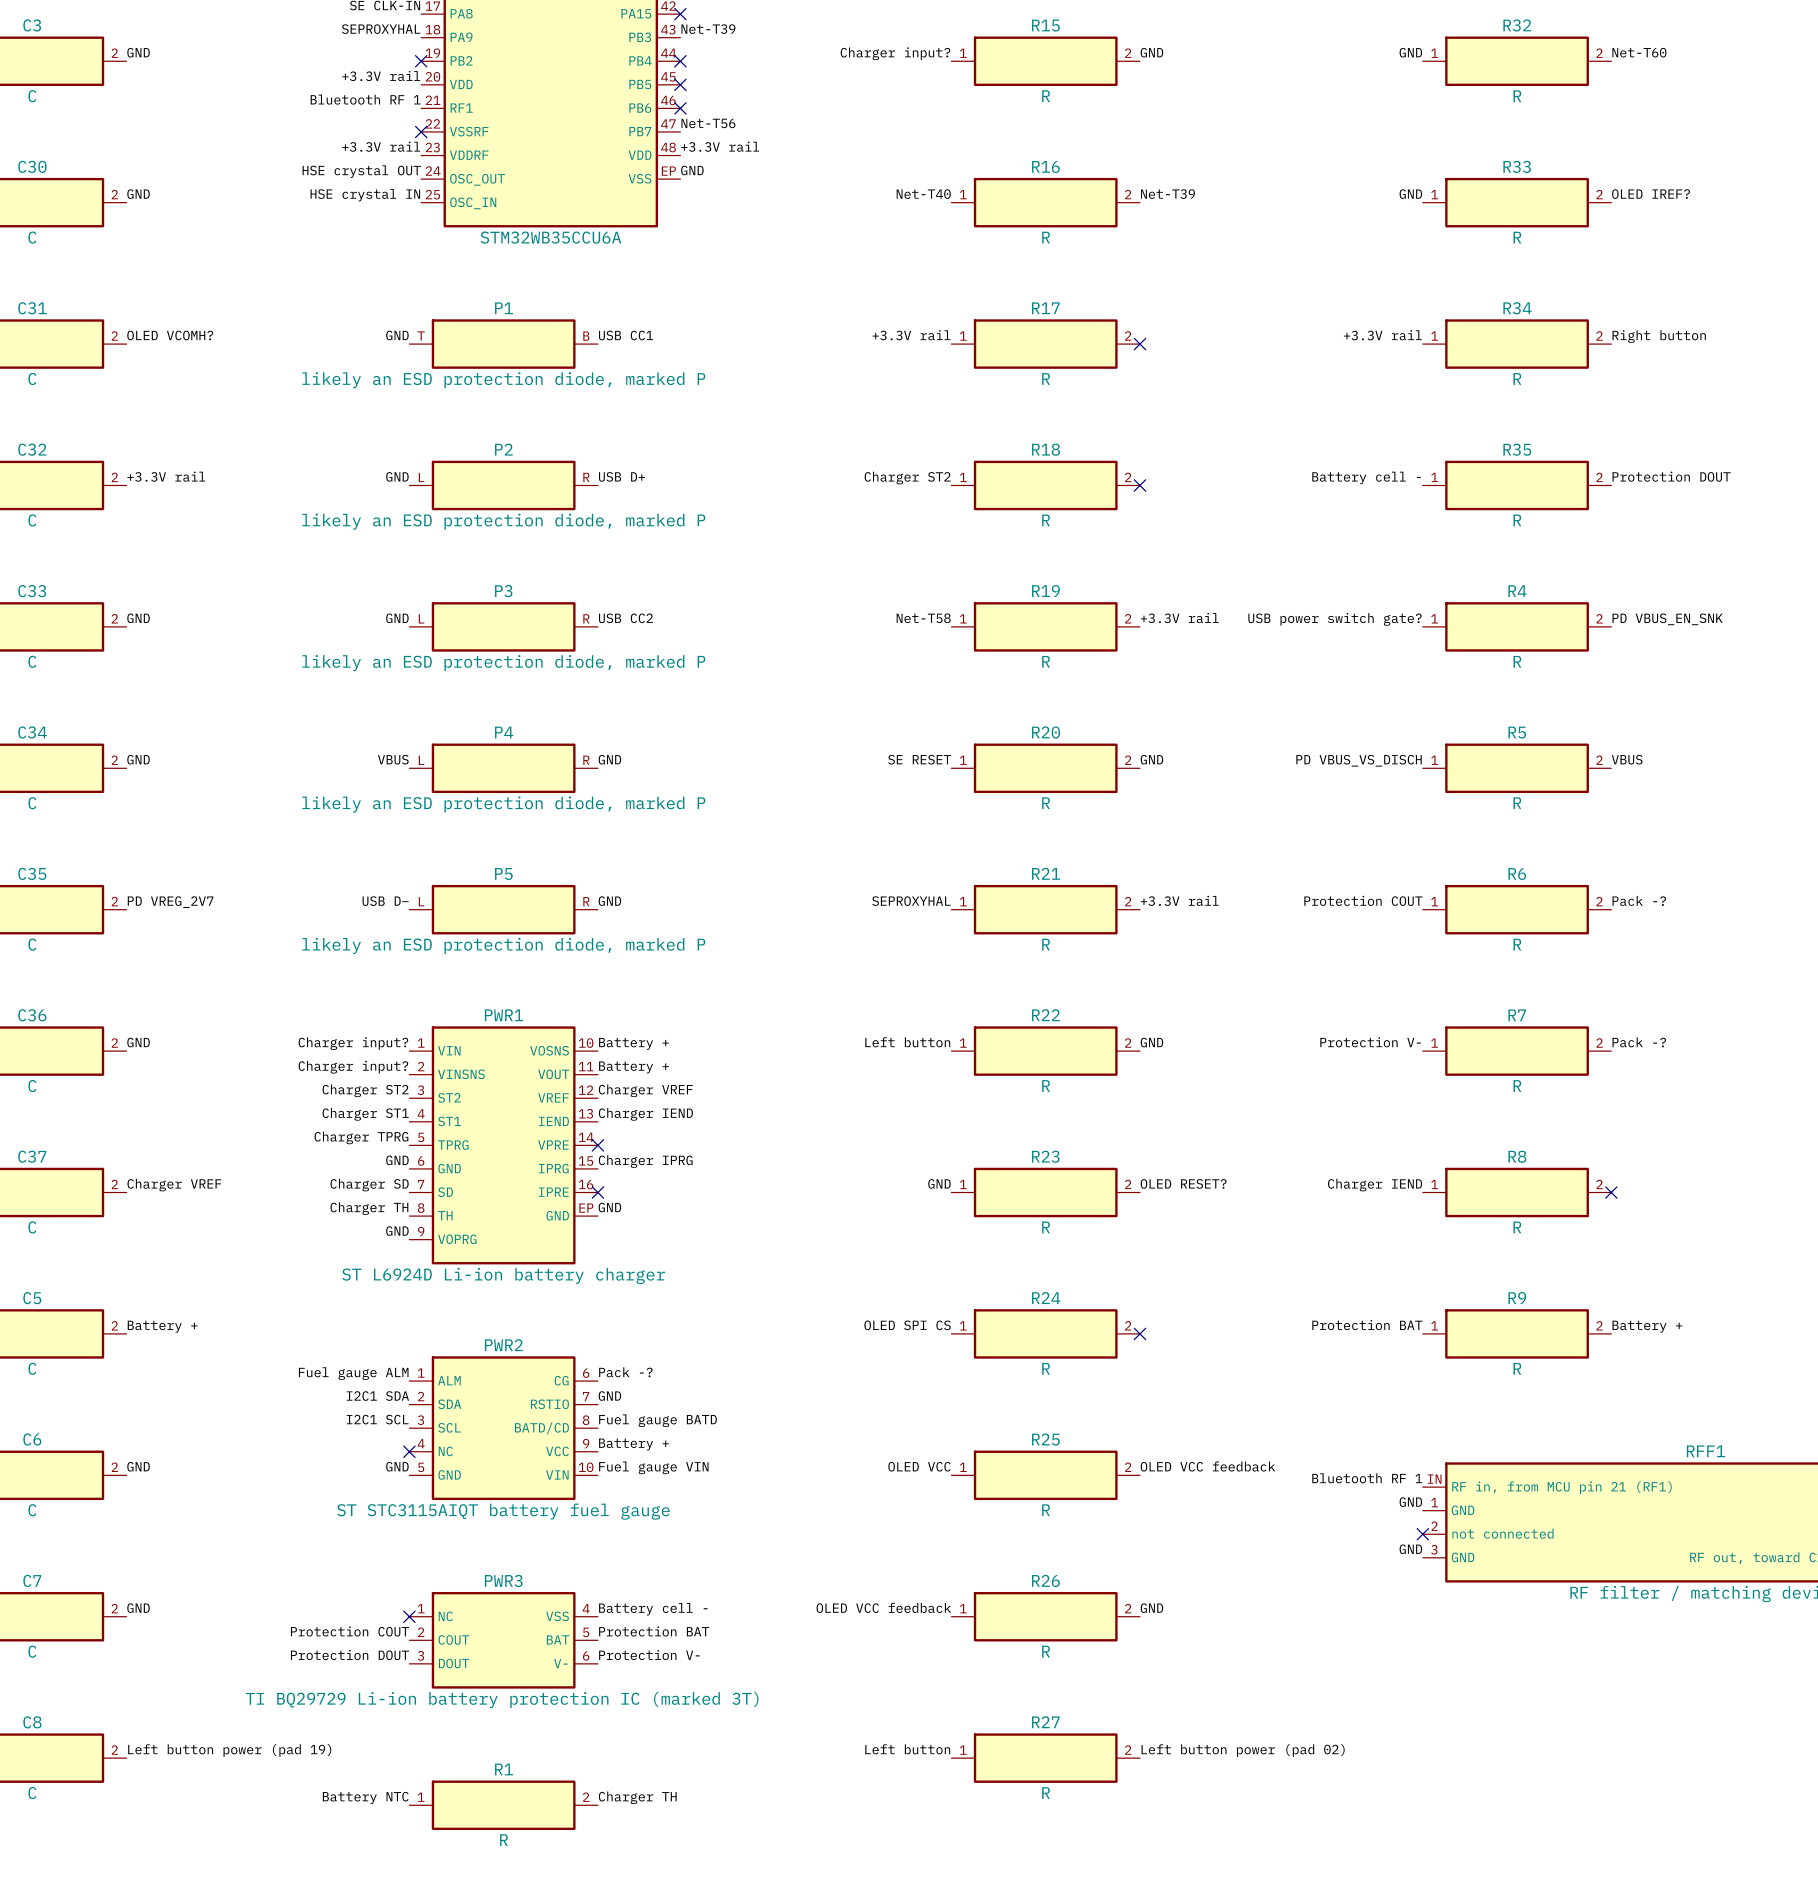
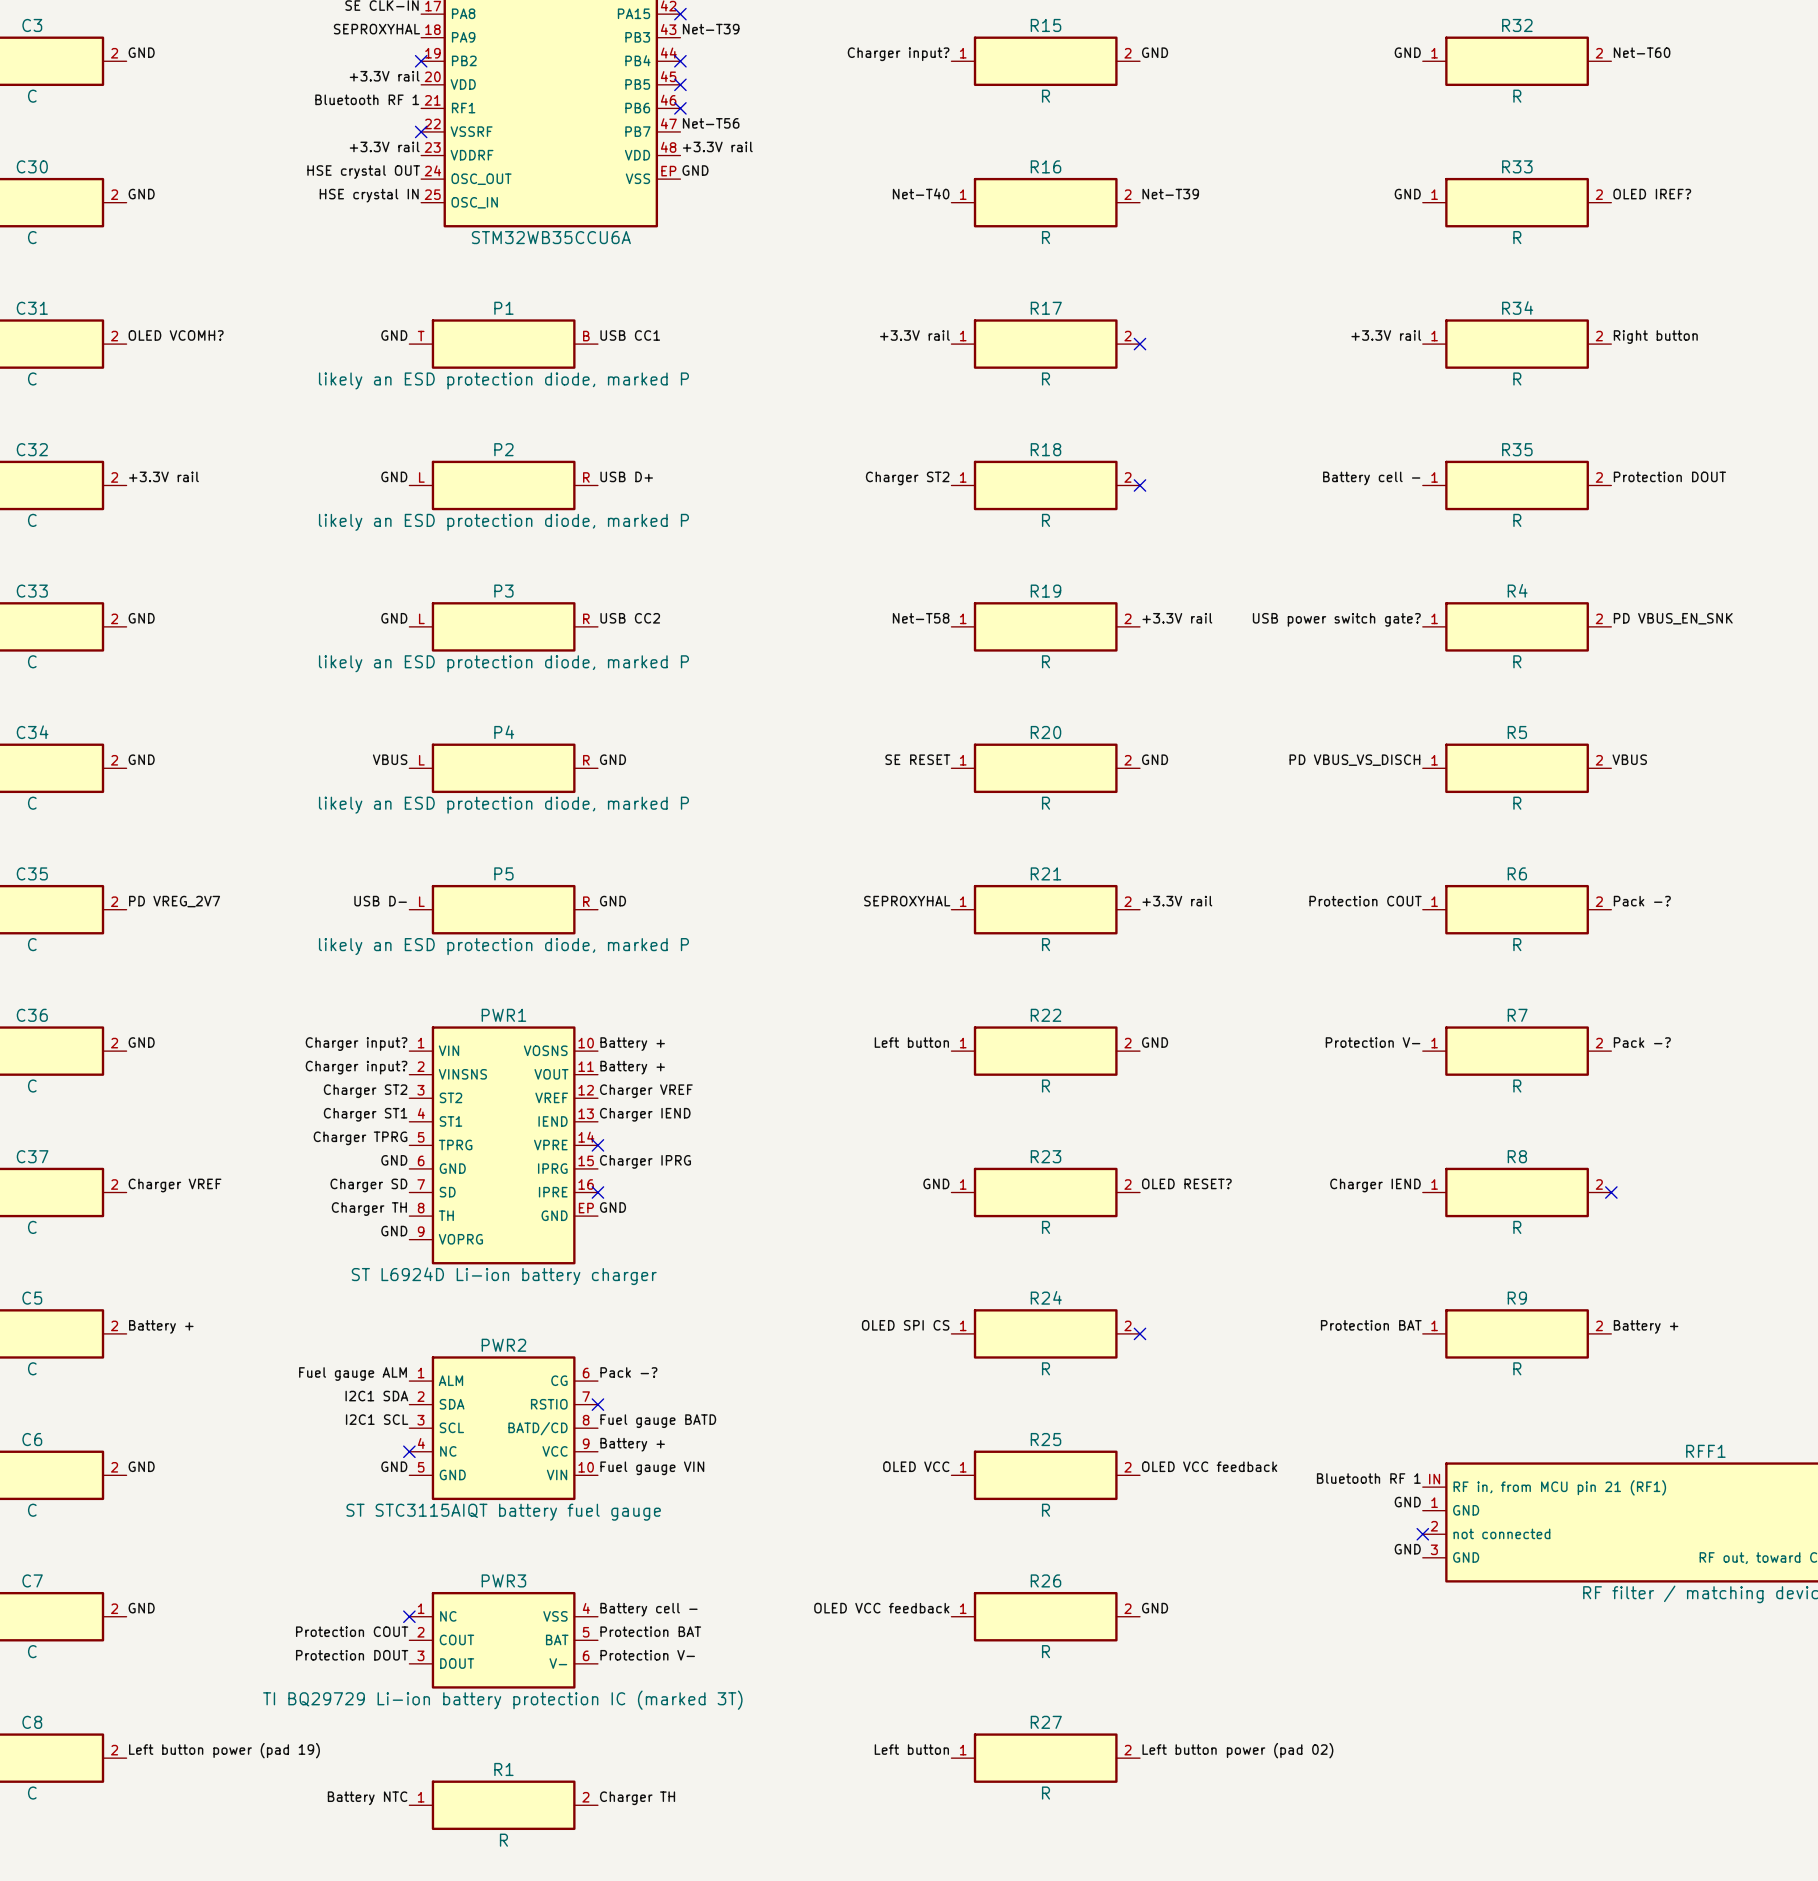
label: GND (609, 1396) -> none
no-connect mark: none -> (597, 1404)

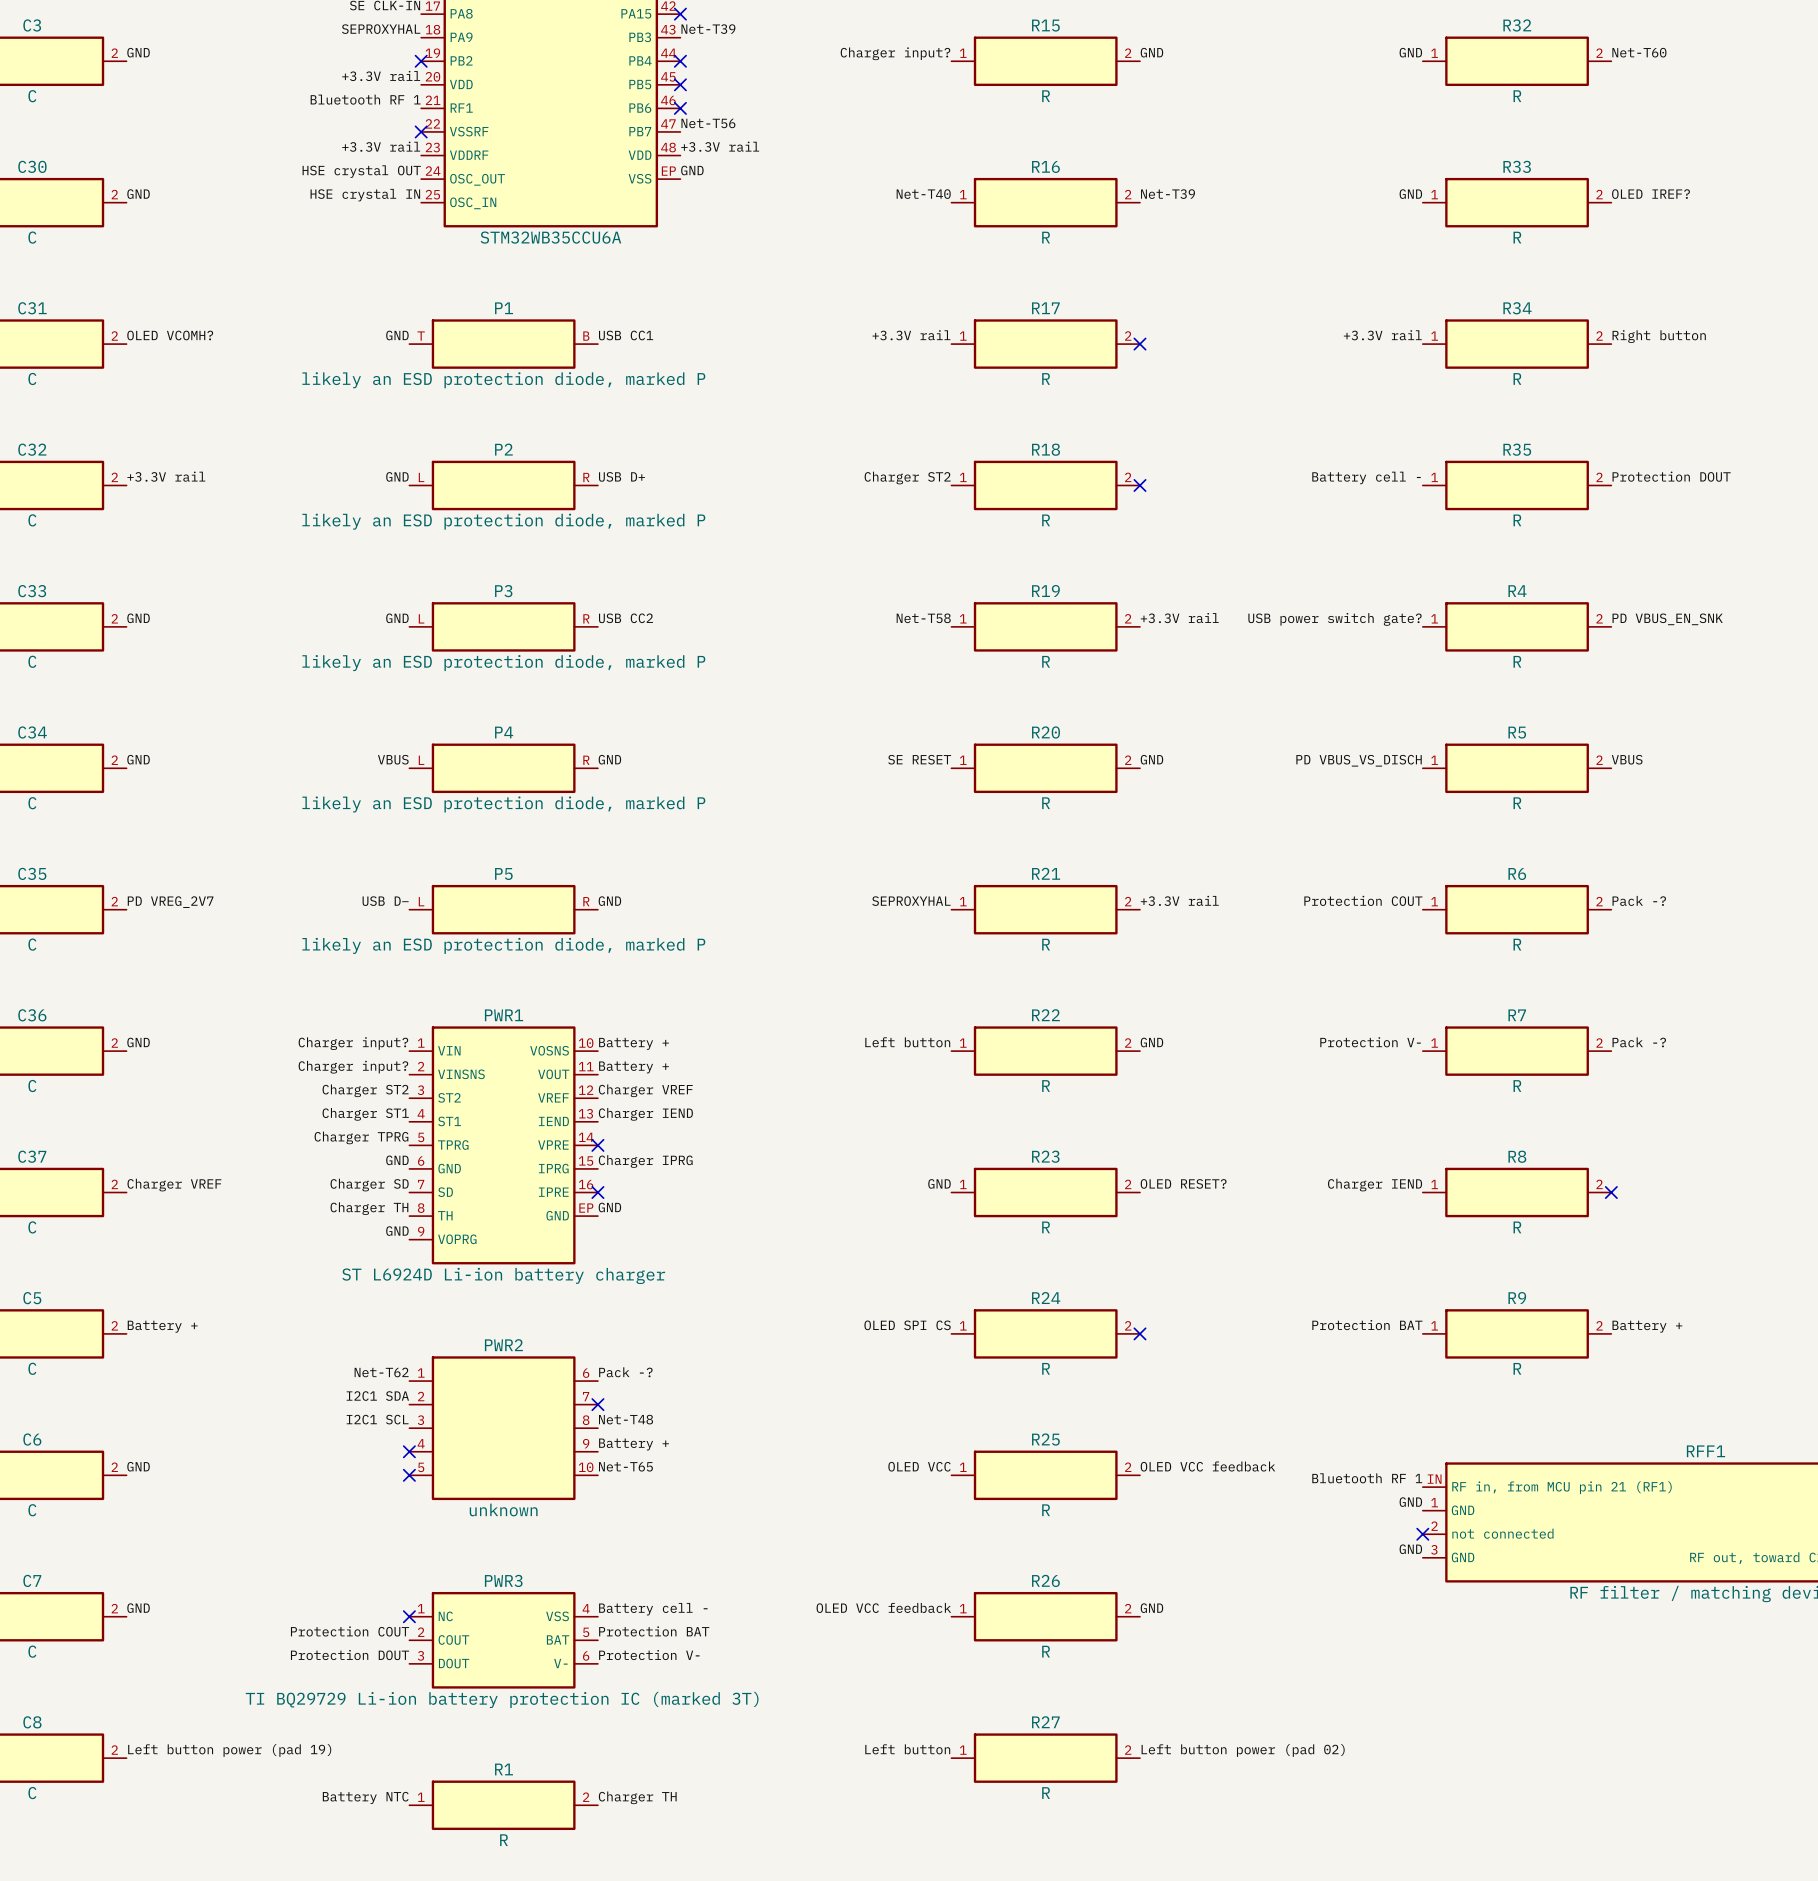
PWR2 symbol: [409, 1356, 598, 1501] -> [409, 1356, 598, 1501]
label: Fuel gauge ALM (353, 1374) -> Net-T62 (381, 1372)
label: Fuel gauge BATD (658, 1421) -> Net-T48 (626, 1419)
label: GND (394, 1466) -> none
label: Fuel gauge VIN (652, 1468) -> Net-T65 (625, 1466)
no-connect mark: none -> (409, 1475)
PWR2 value: ST STC3115AIQT battery fuel gauge (503, 1512) -> unknown (503, 1509)

